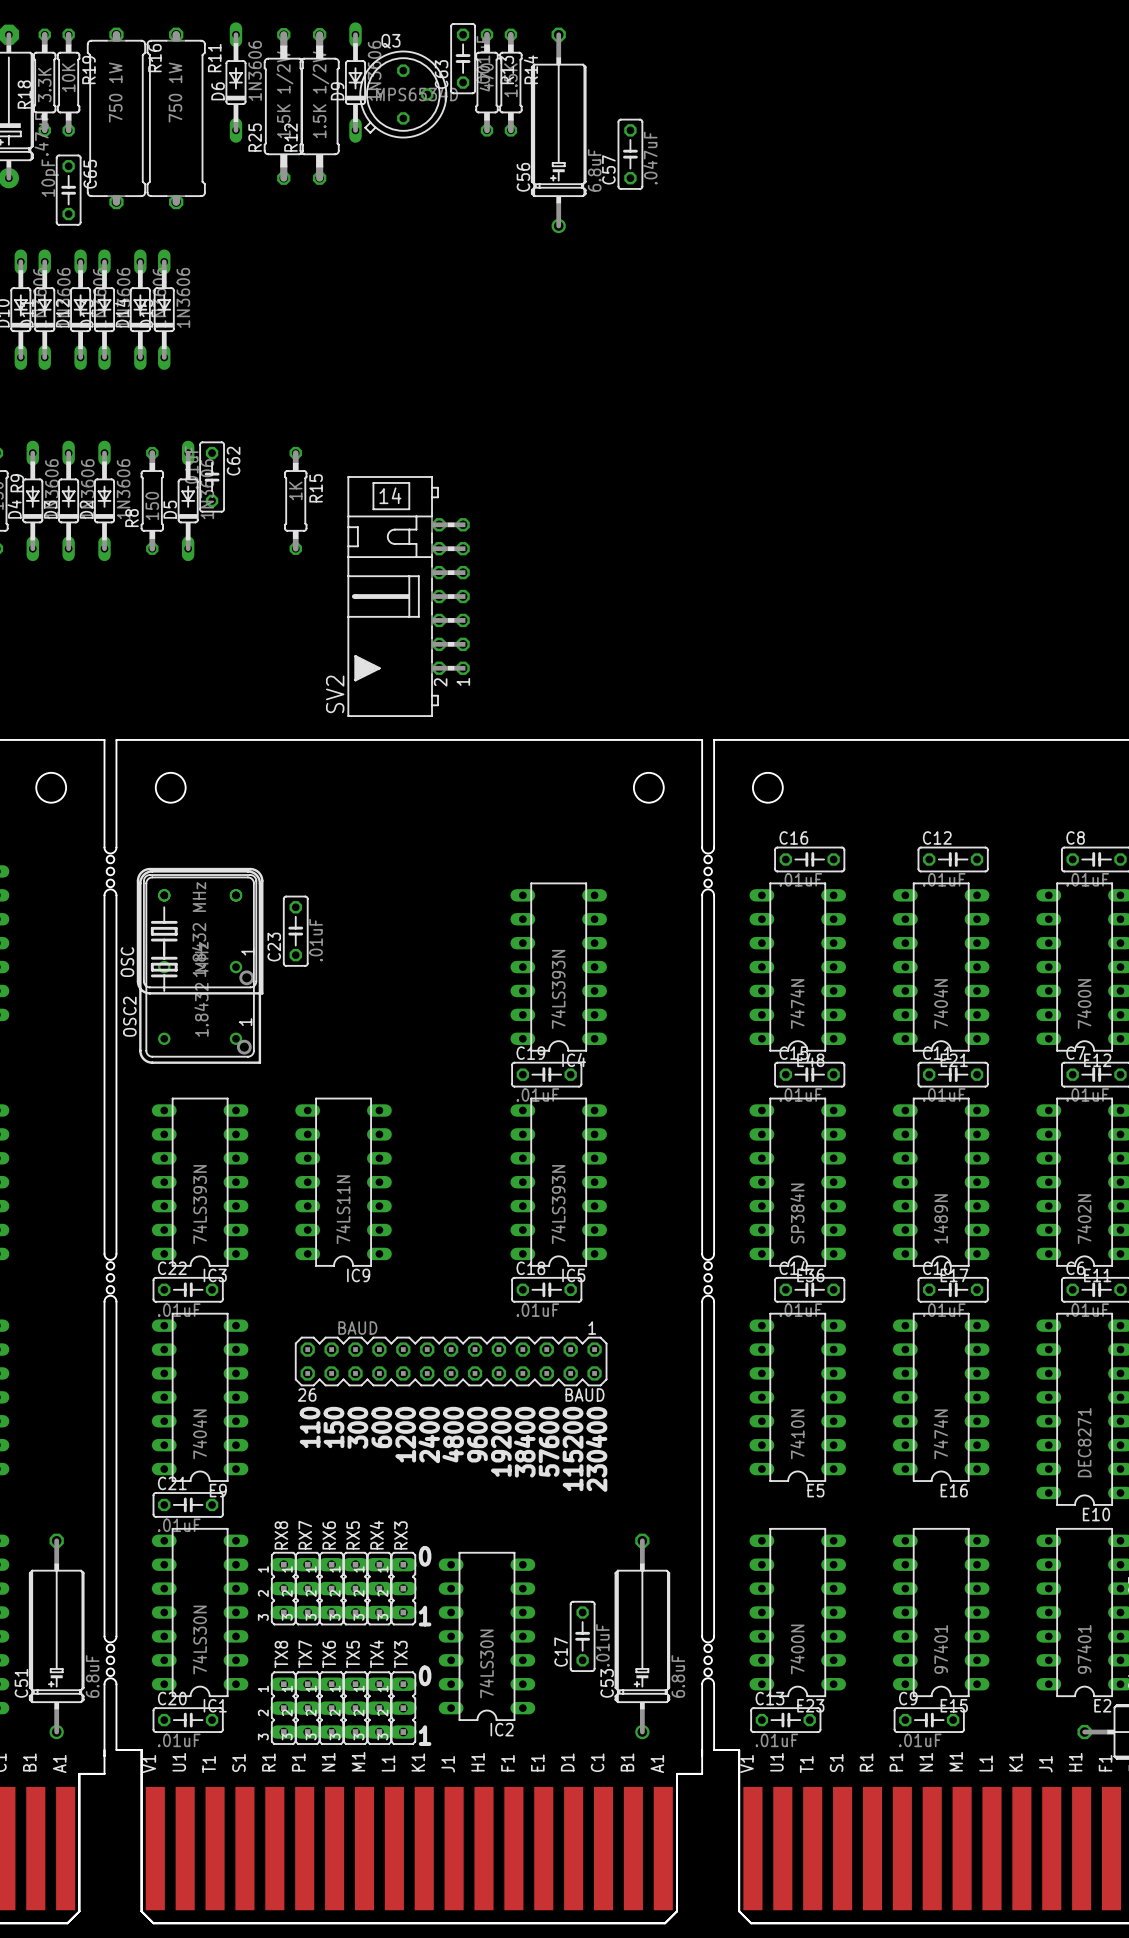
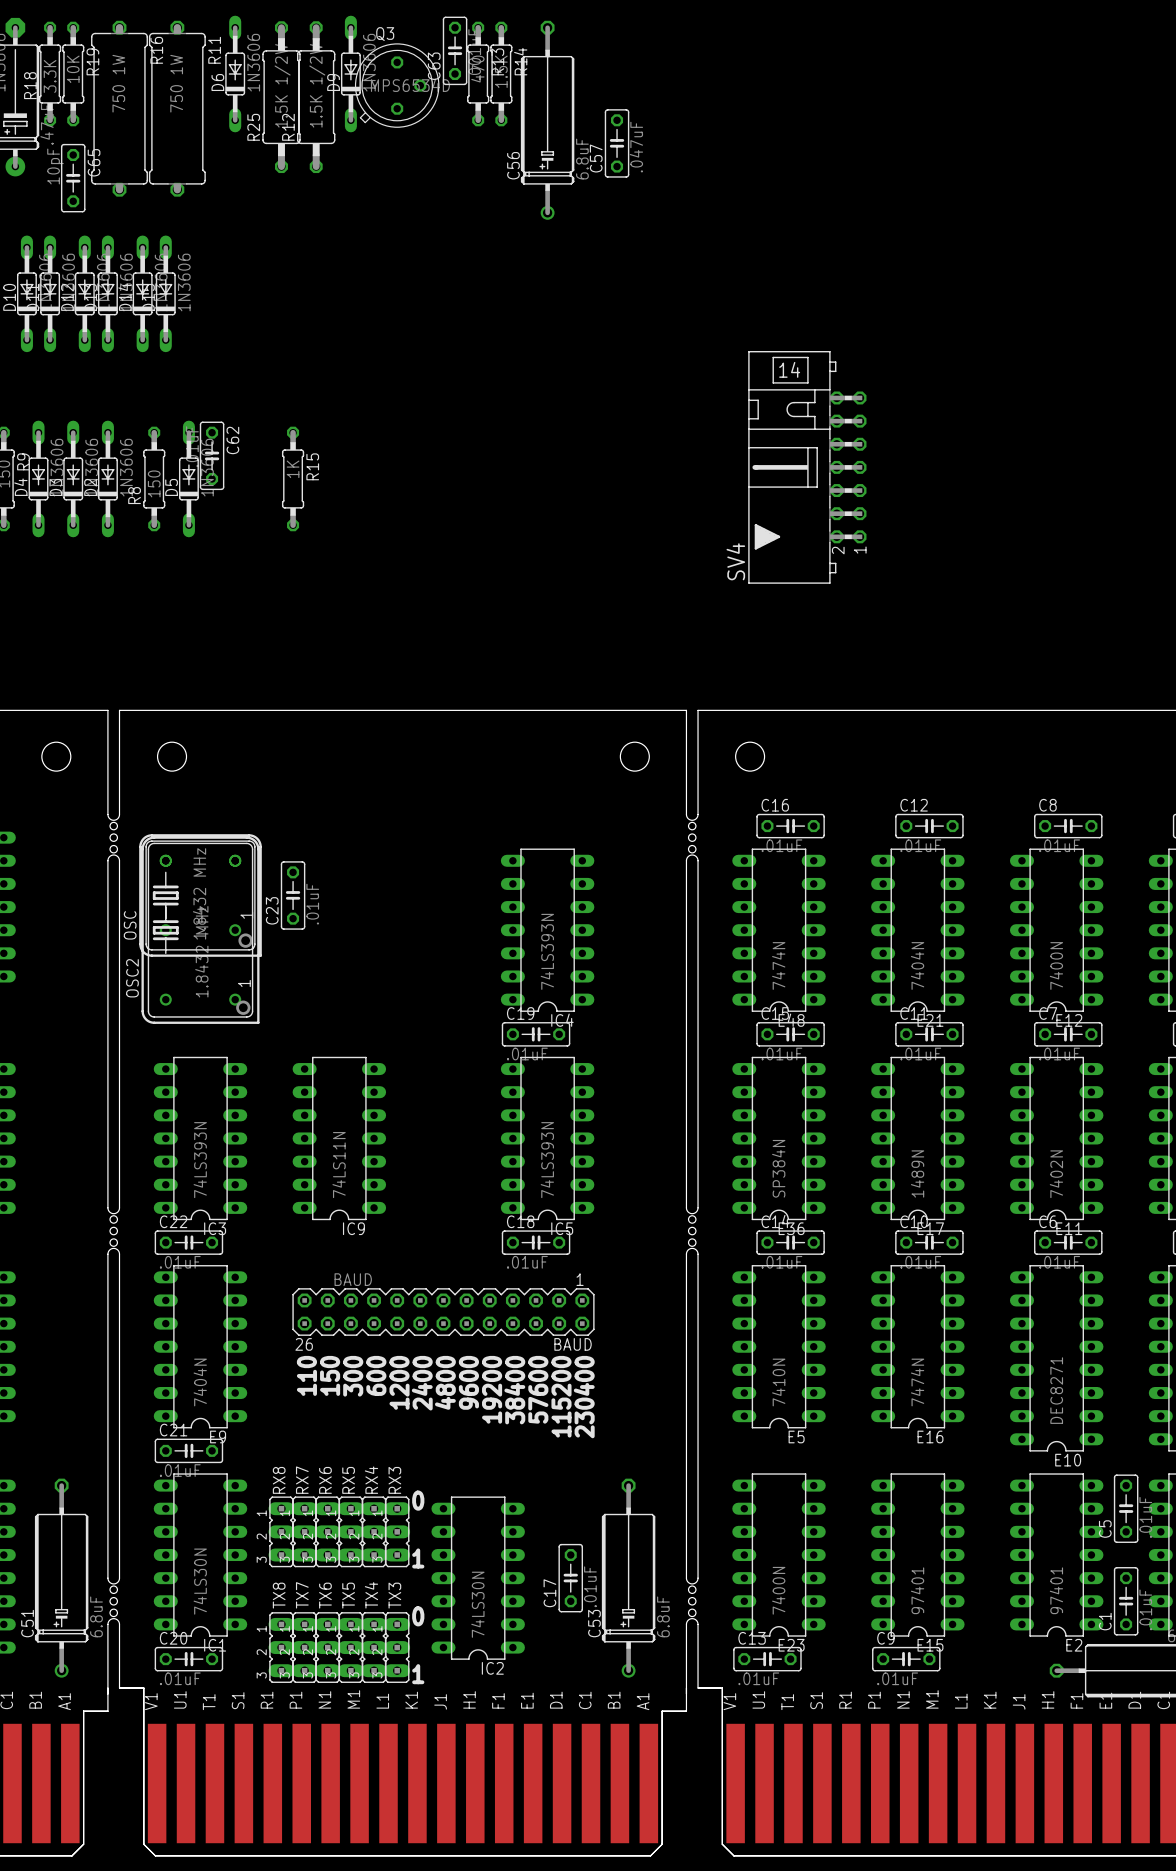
SV4: none -> (807, 467)
SV2: (408, 596) -> none

